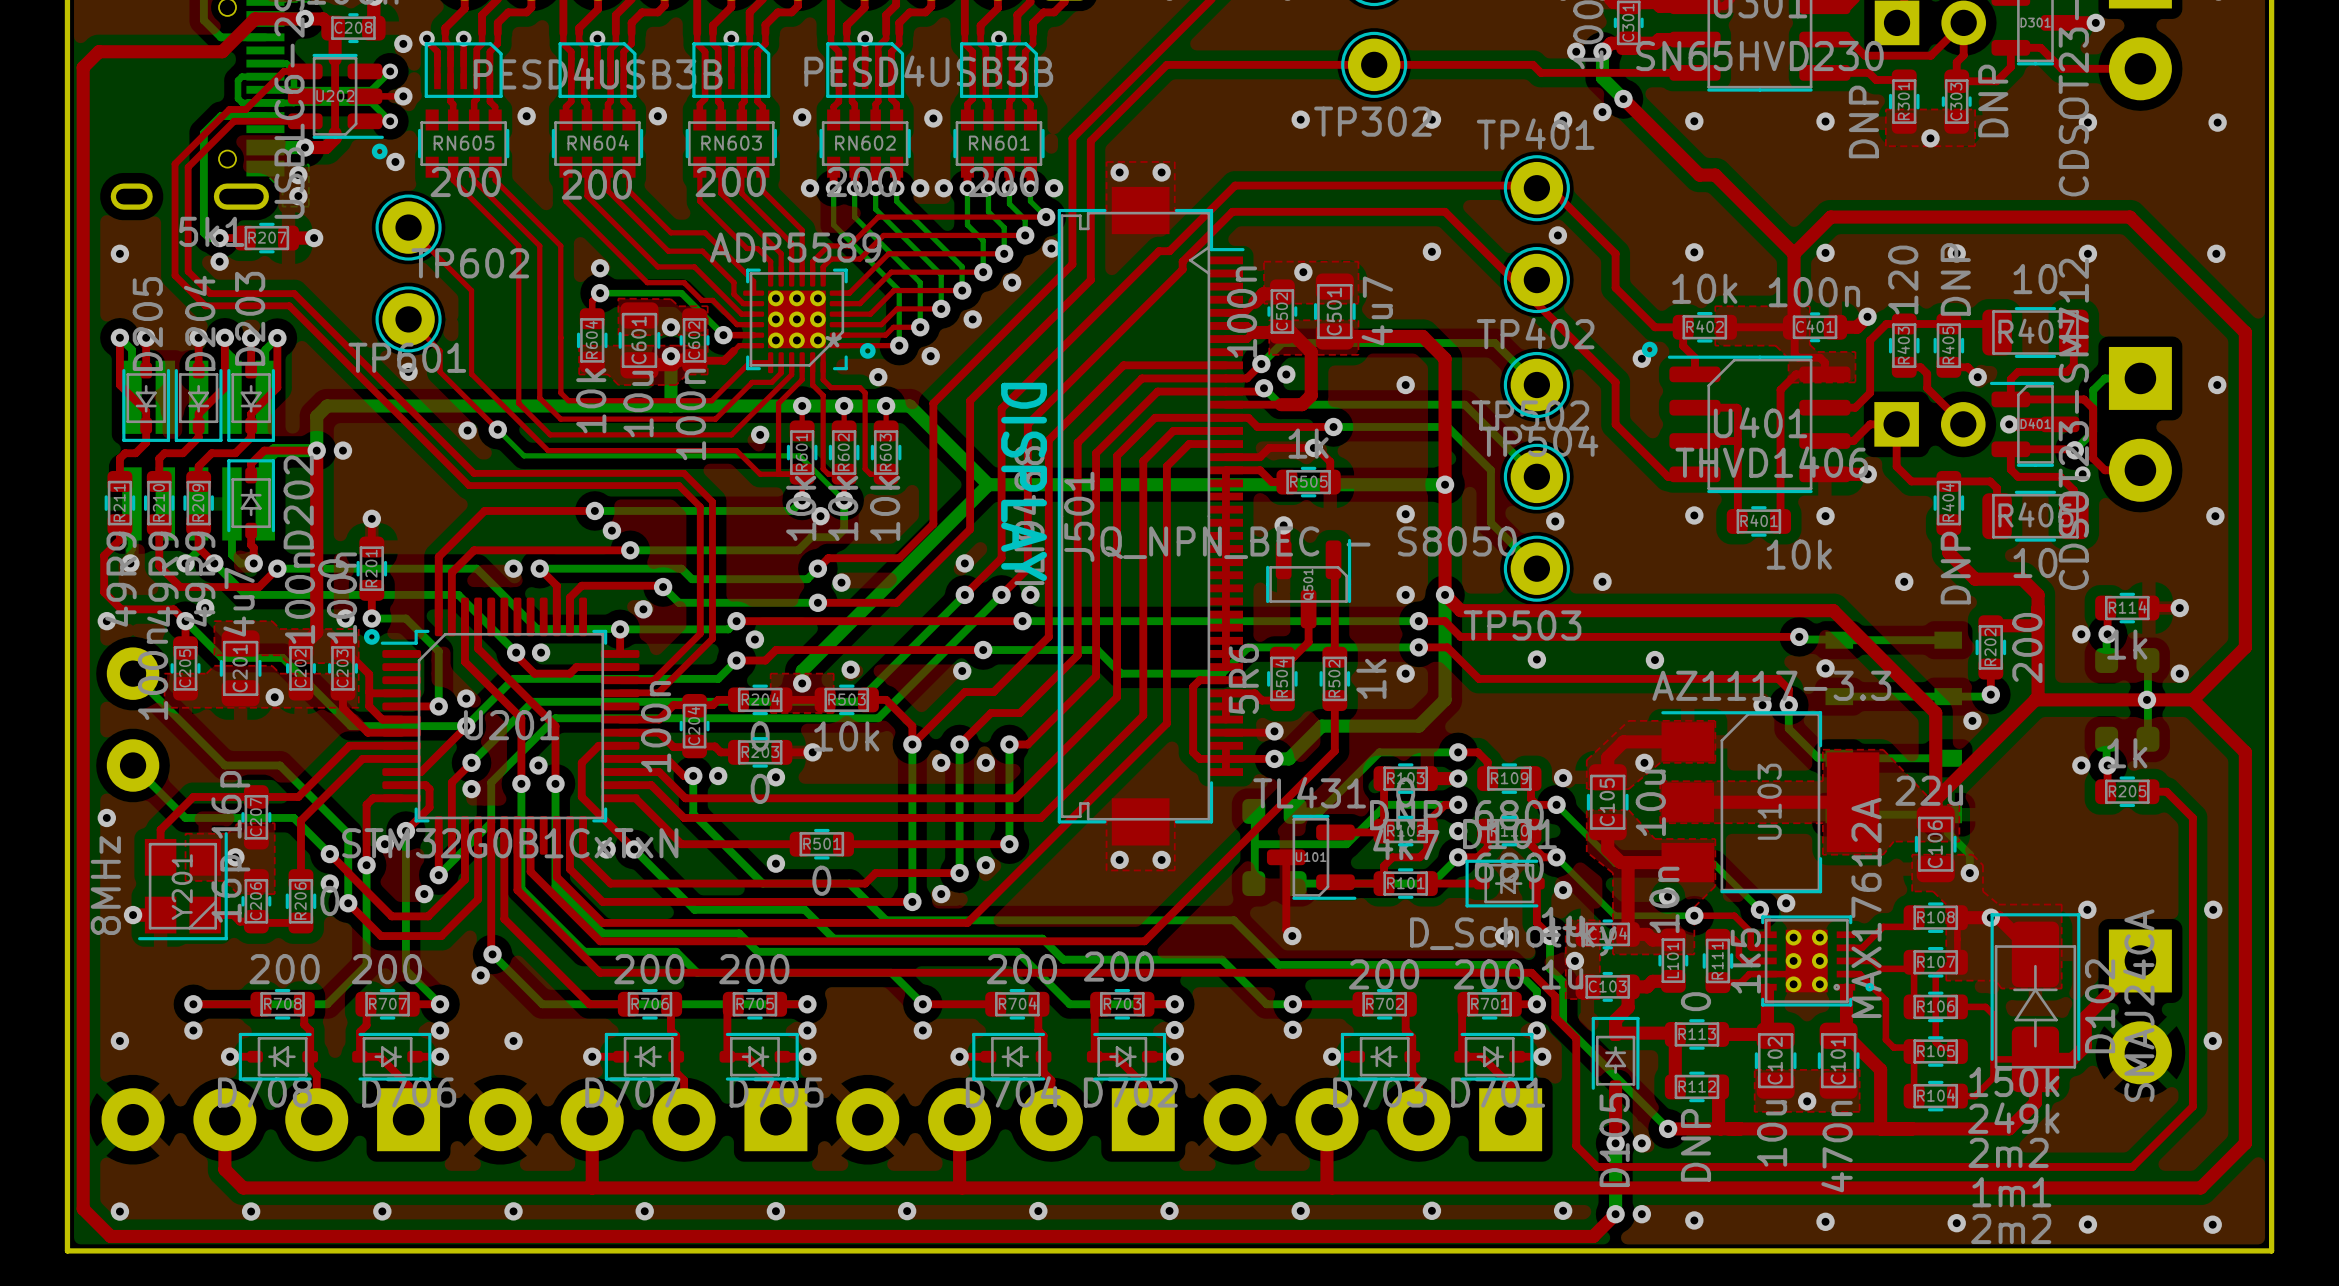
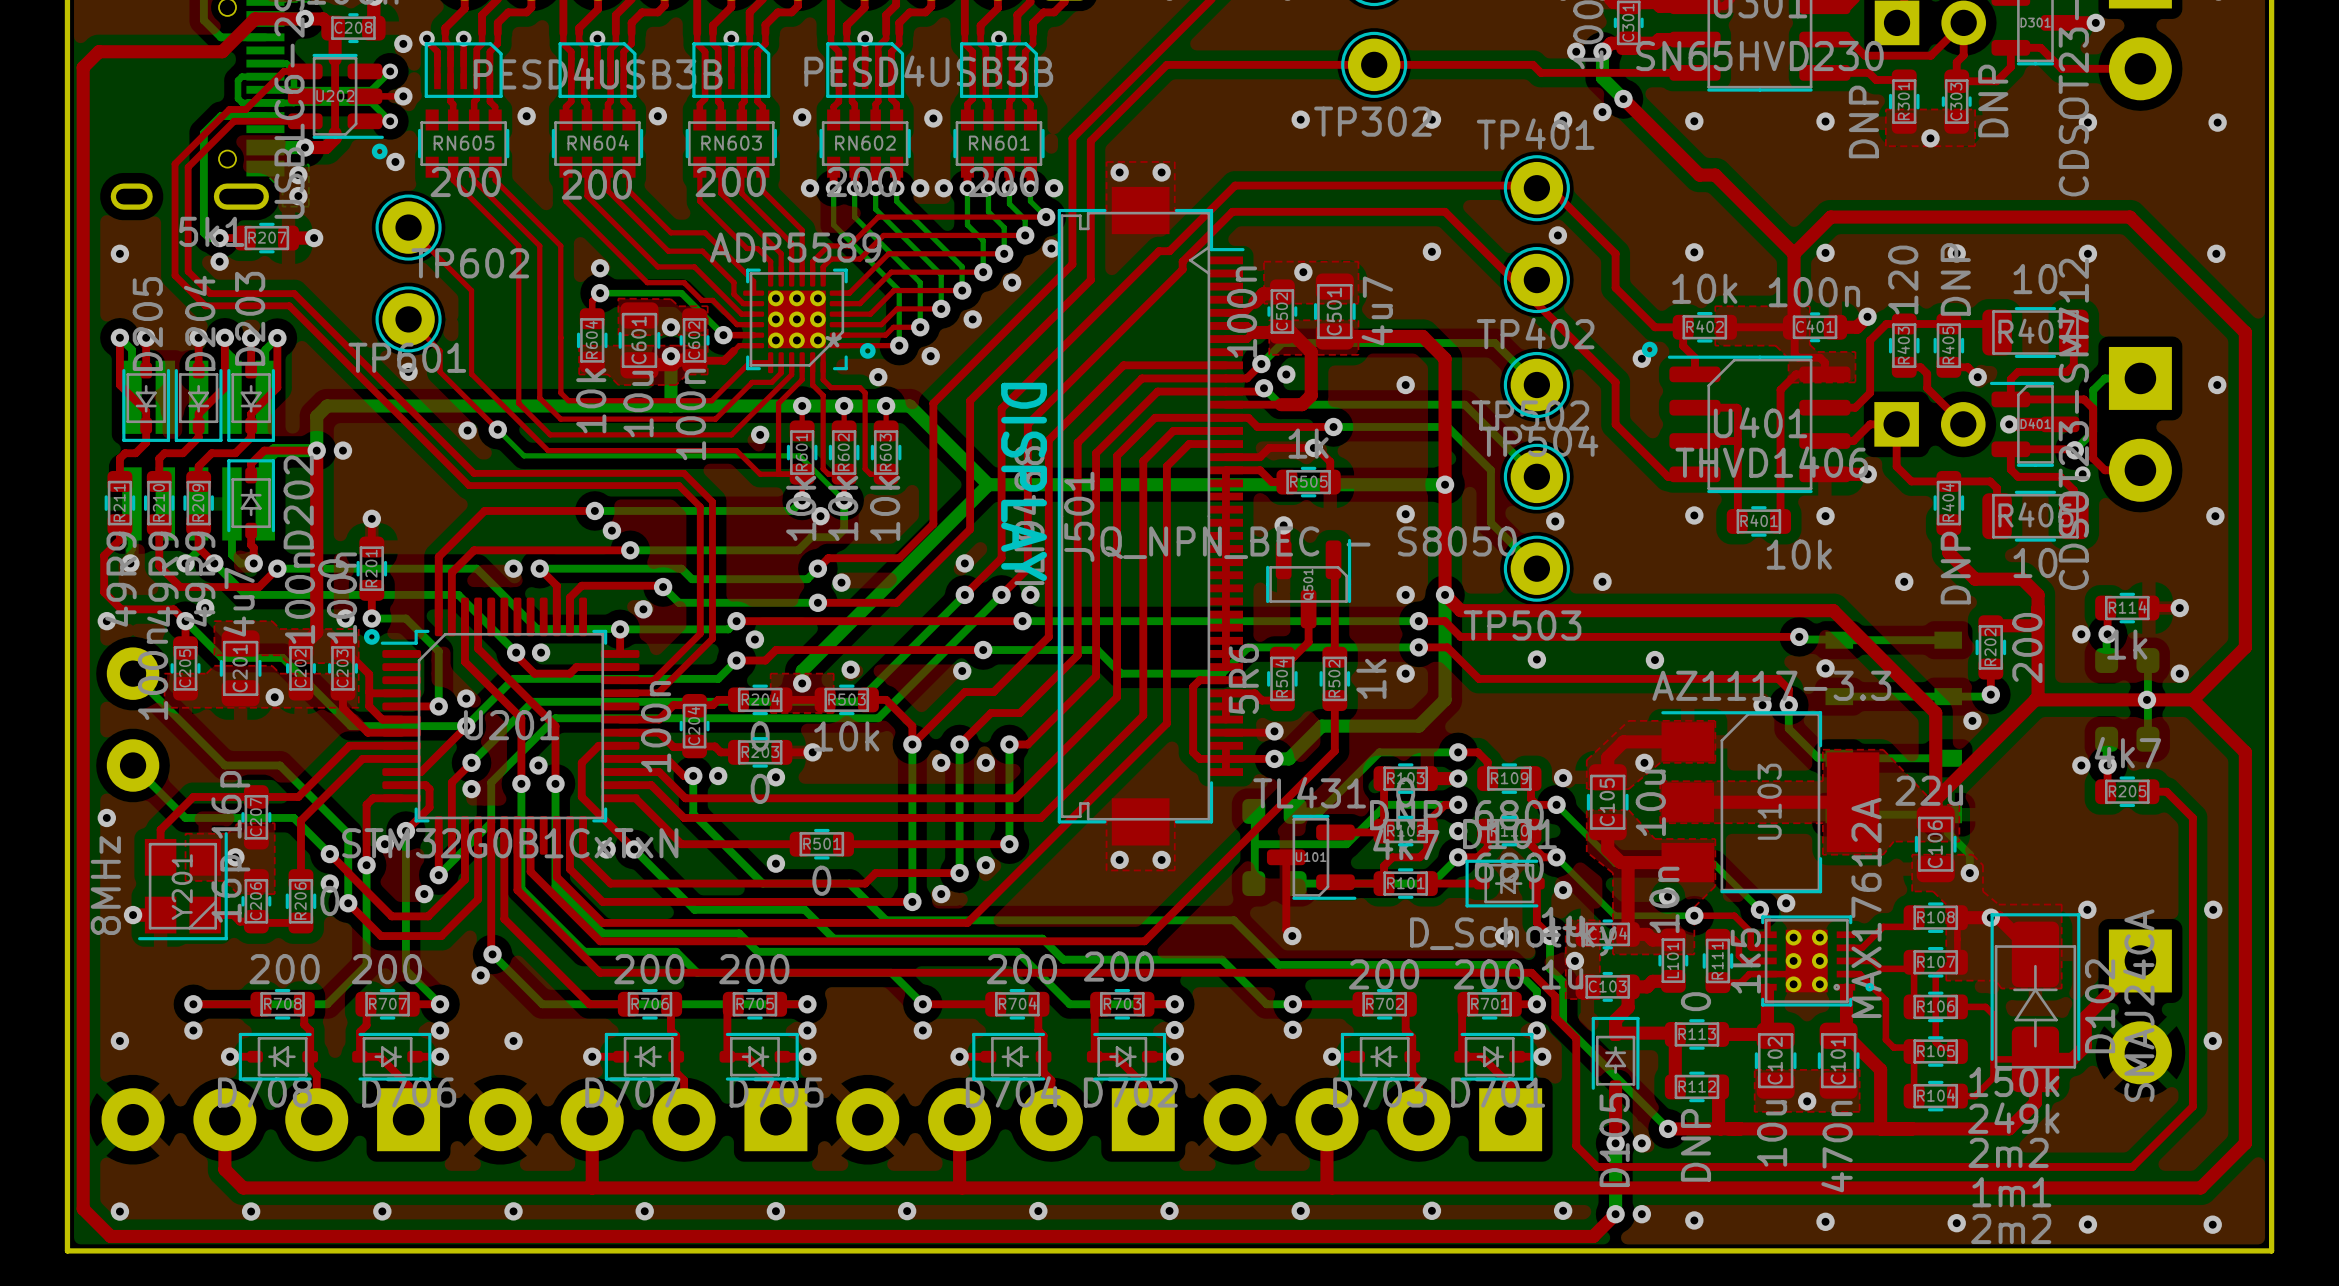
R205 value: 1k (2127, 753) -> 4k7 (2127, 752)

